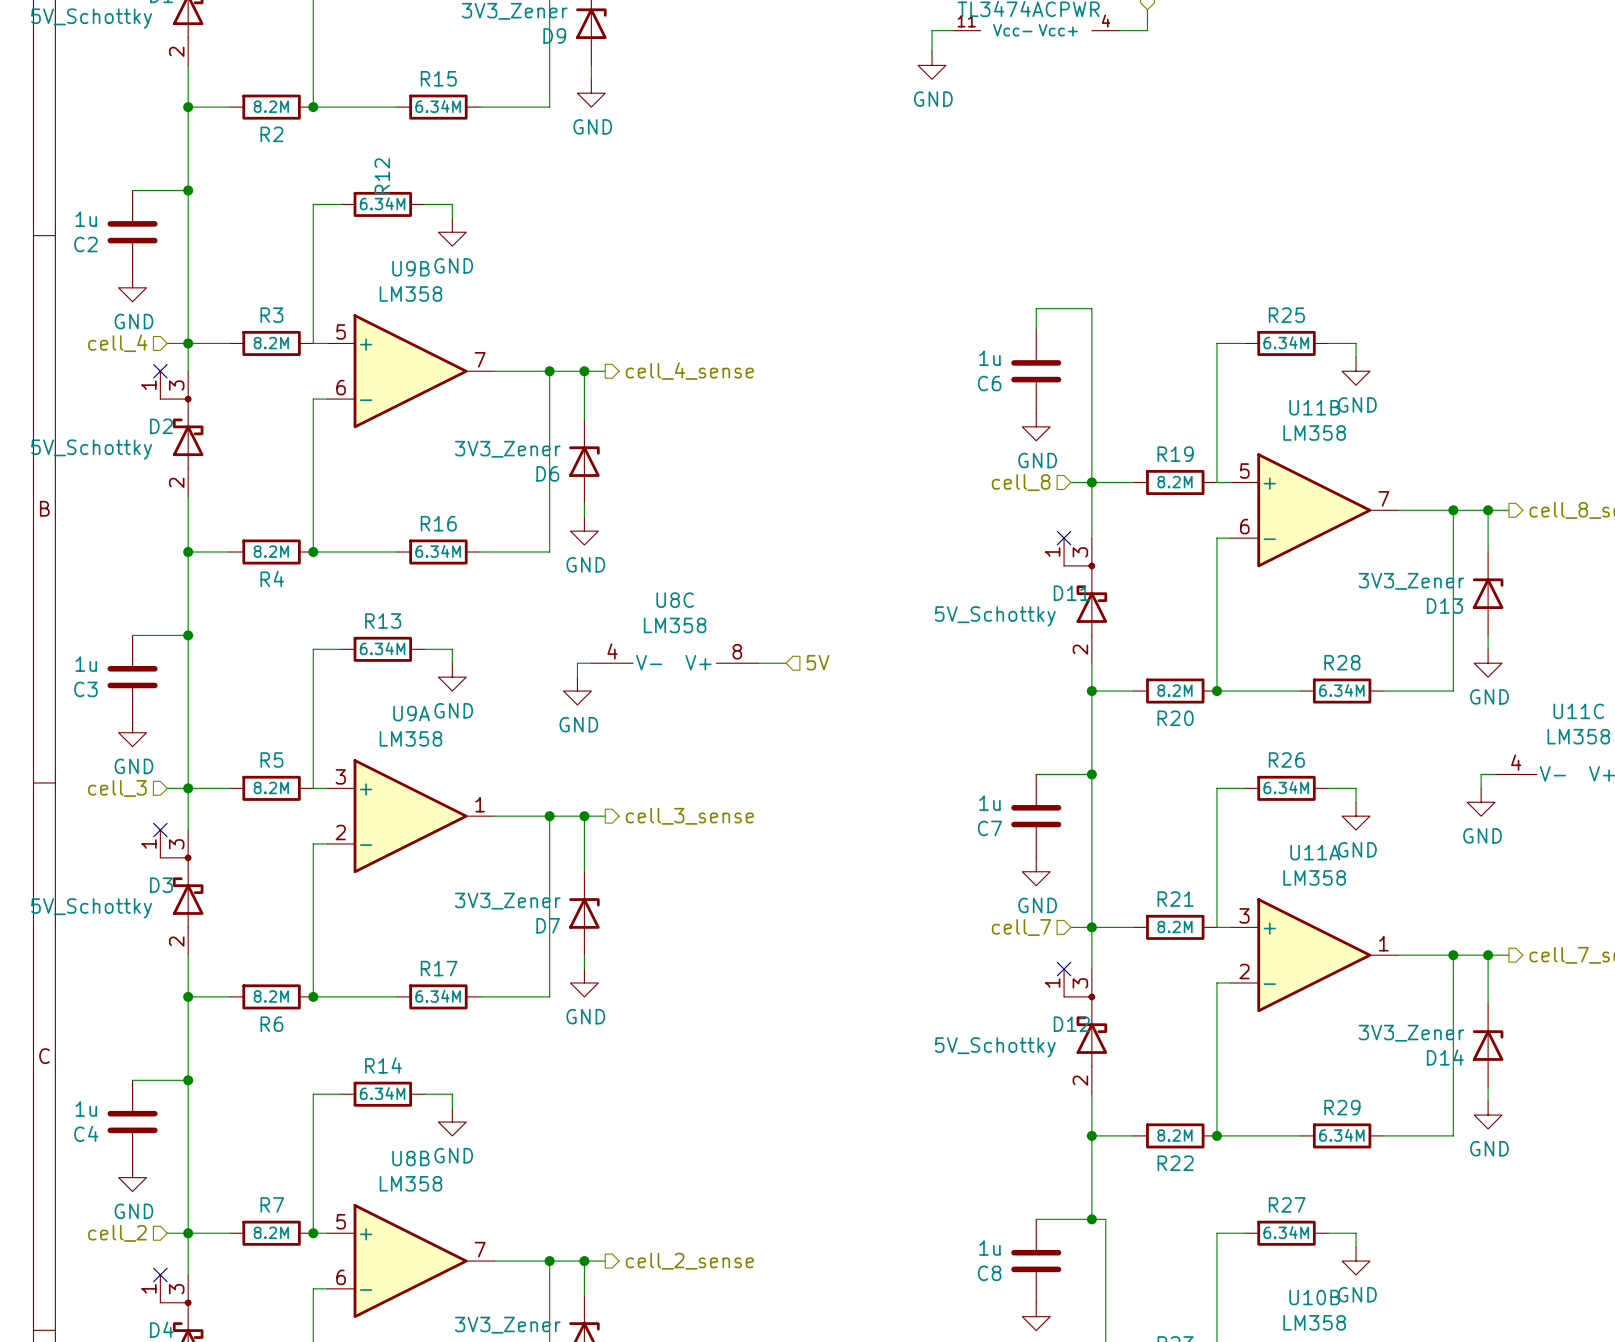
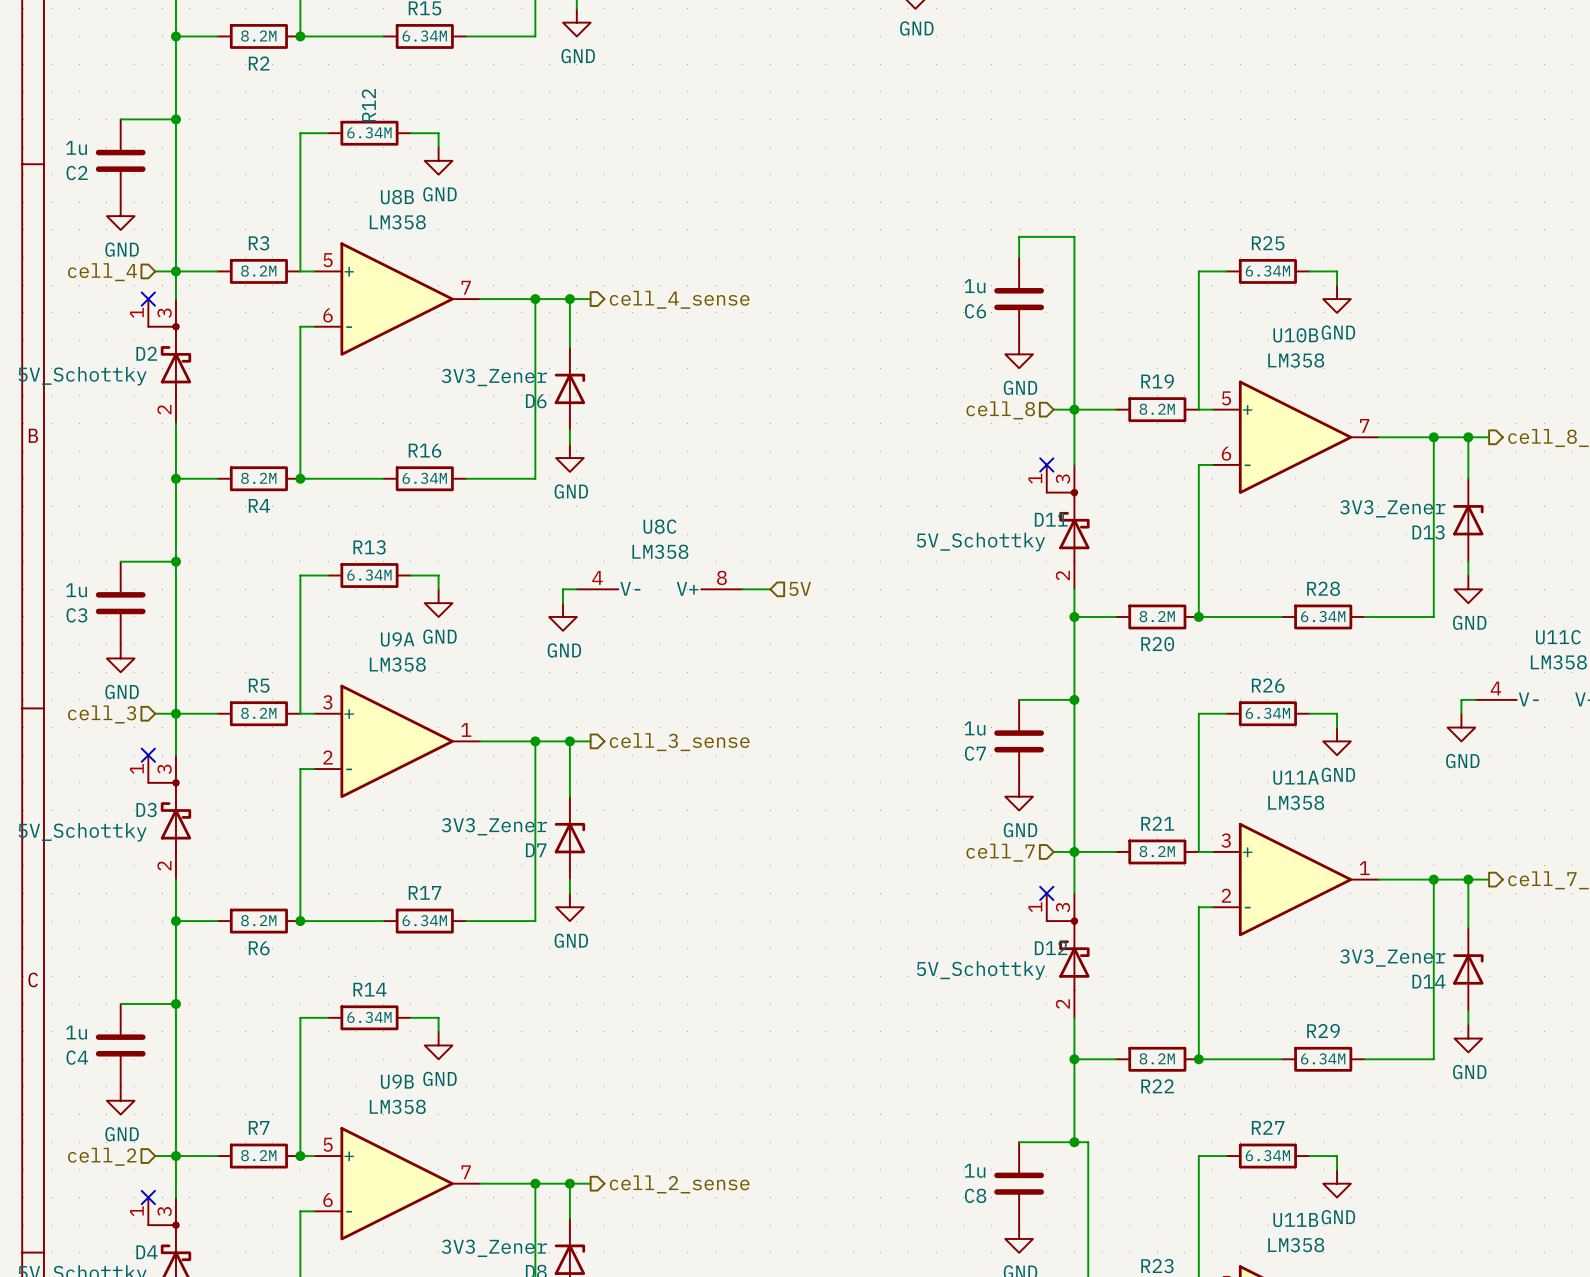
U9B name: U9B (410, 268) -> U8B (397, 197)
U11B name: U11B (1314, 407) -> U10B (1295, 335)
U8B name: U8B (410, 1158) -> U9B (397, 1081)
U10B name: U10B (1314, 1297) -> U11B (1295, 1220)

